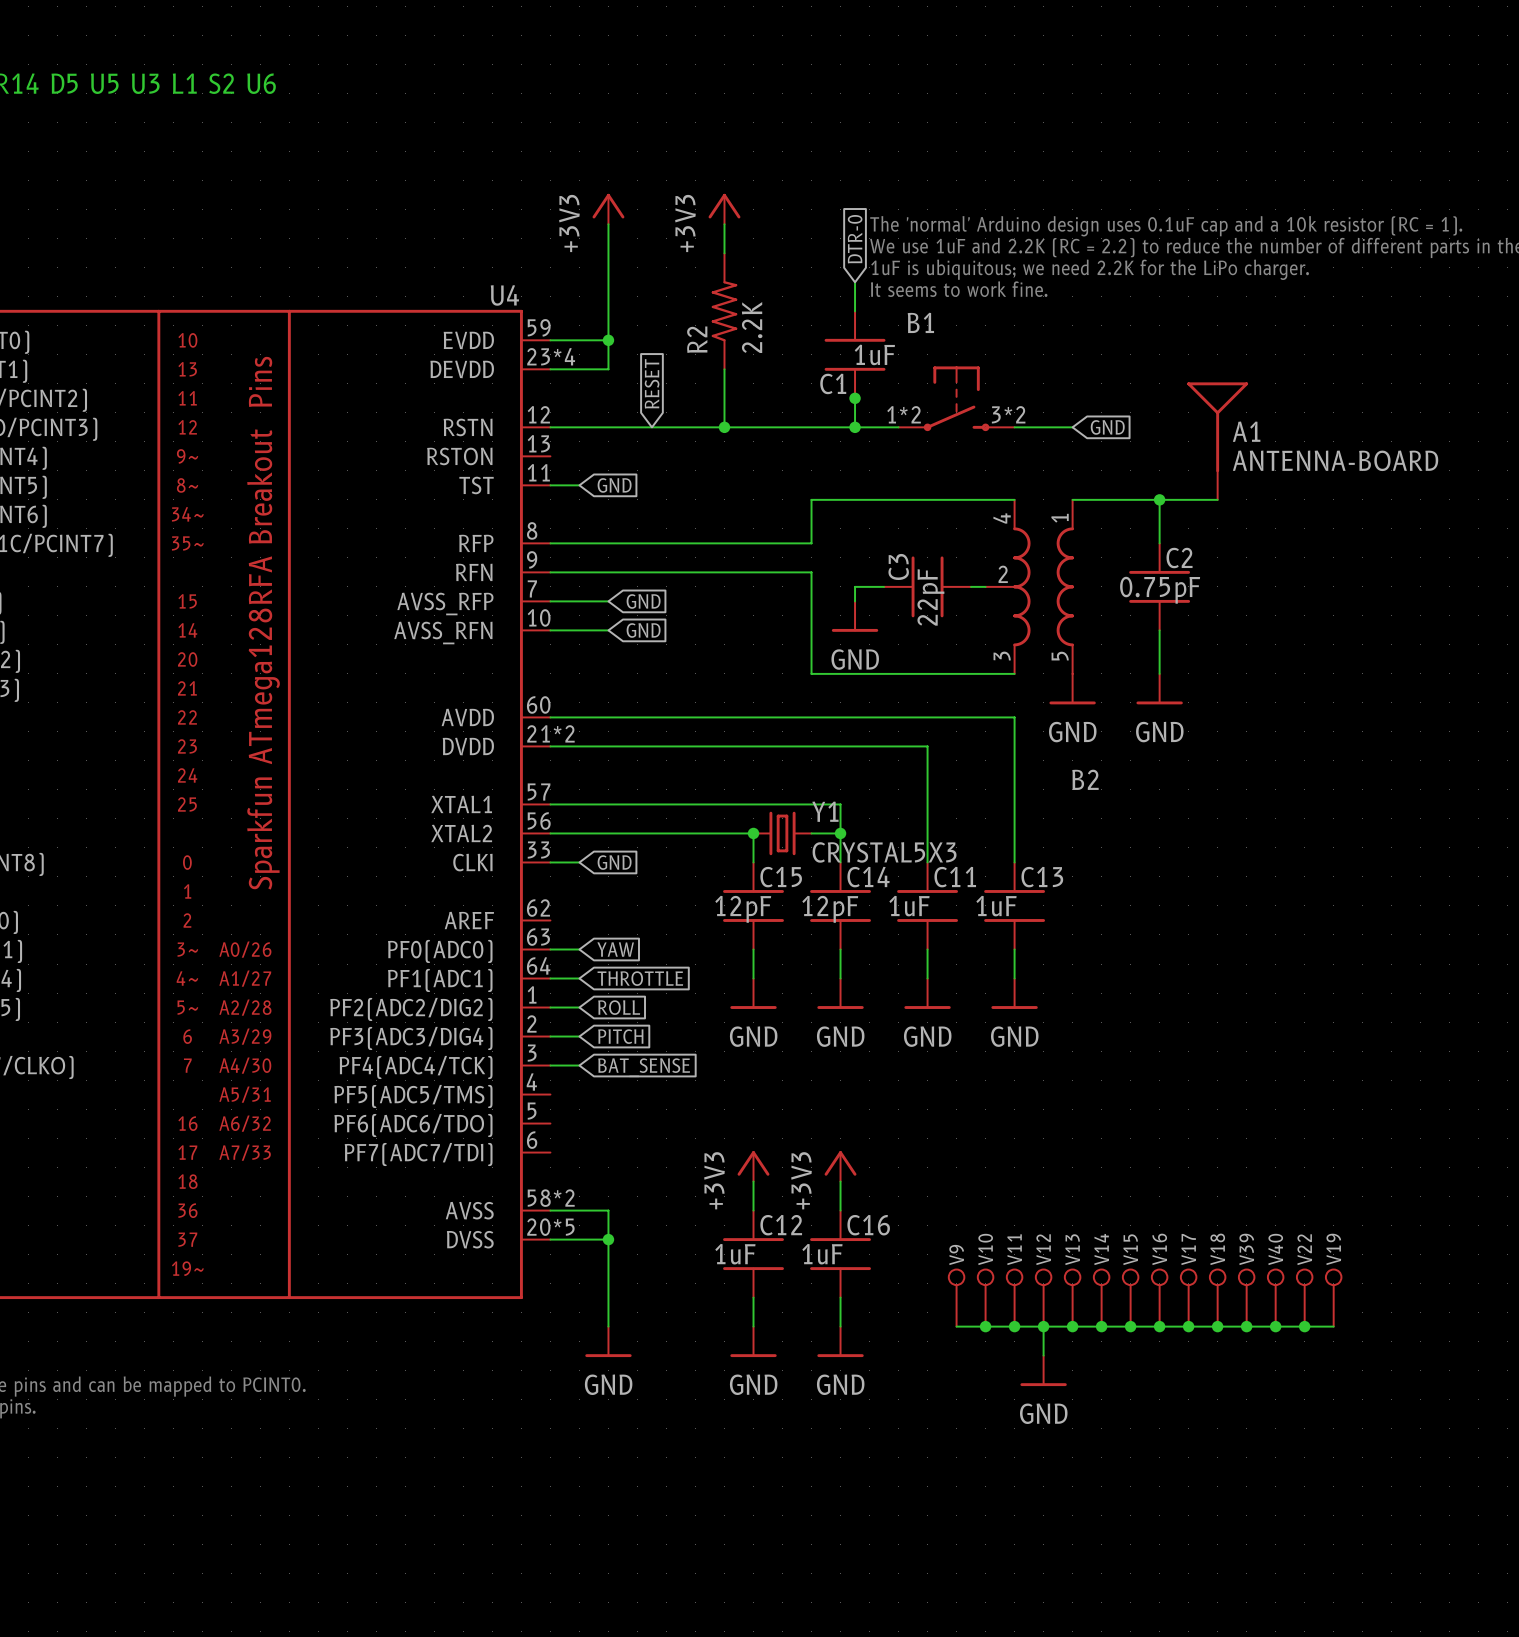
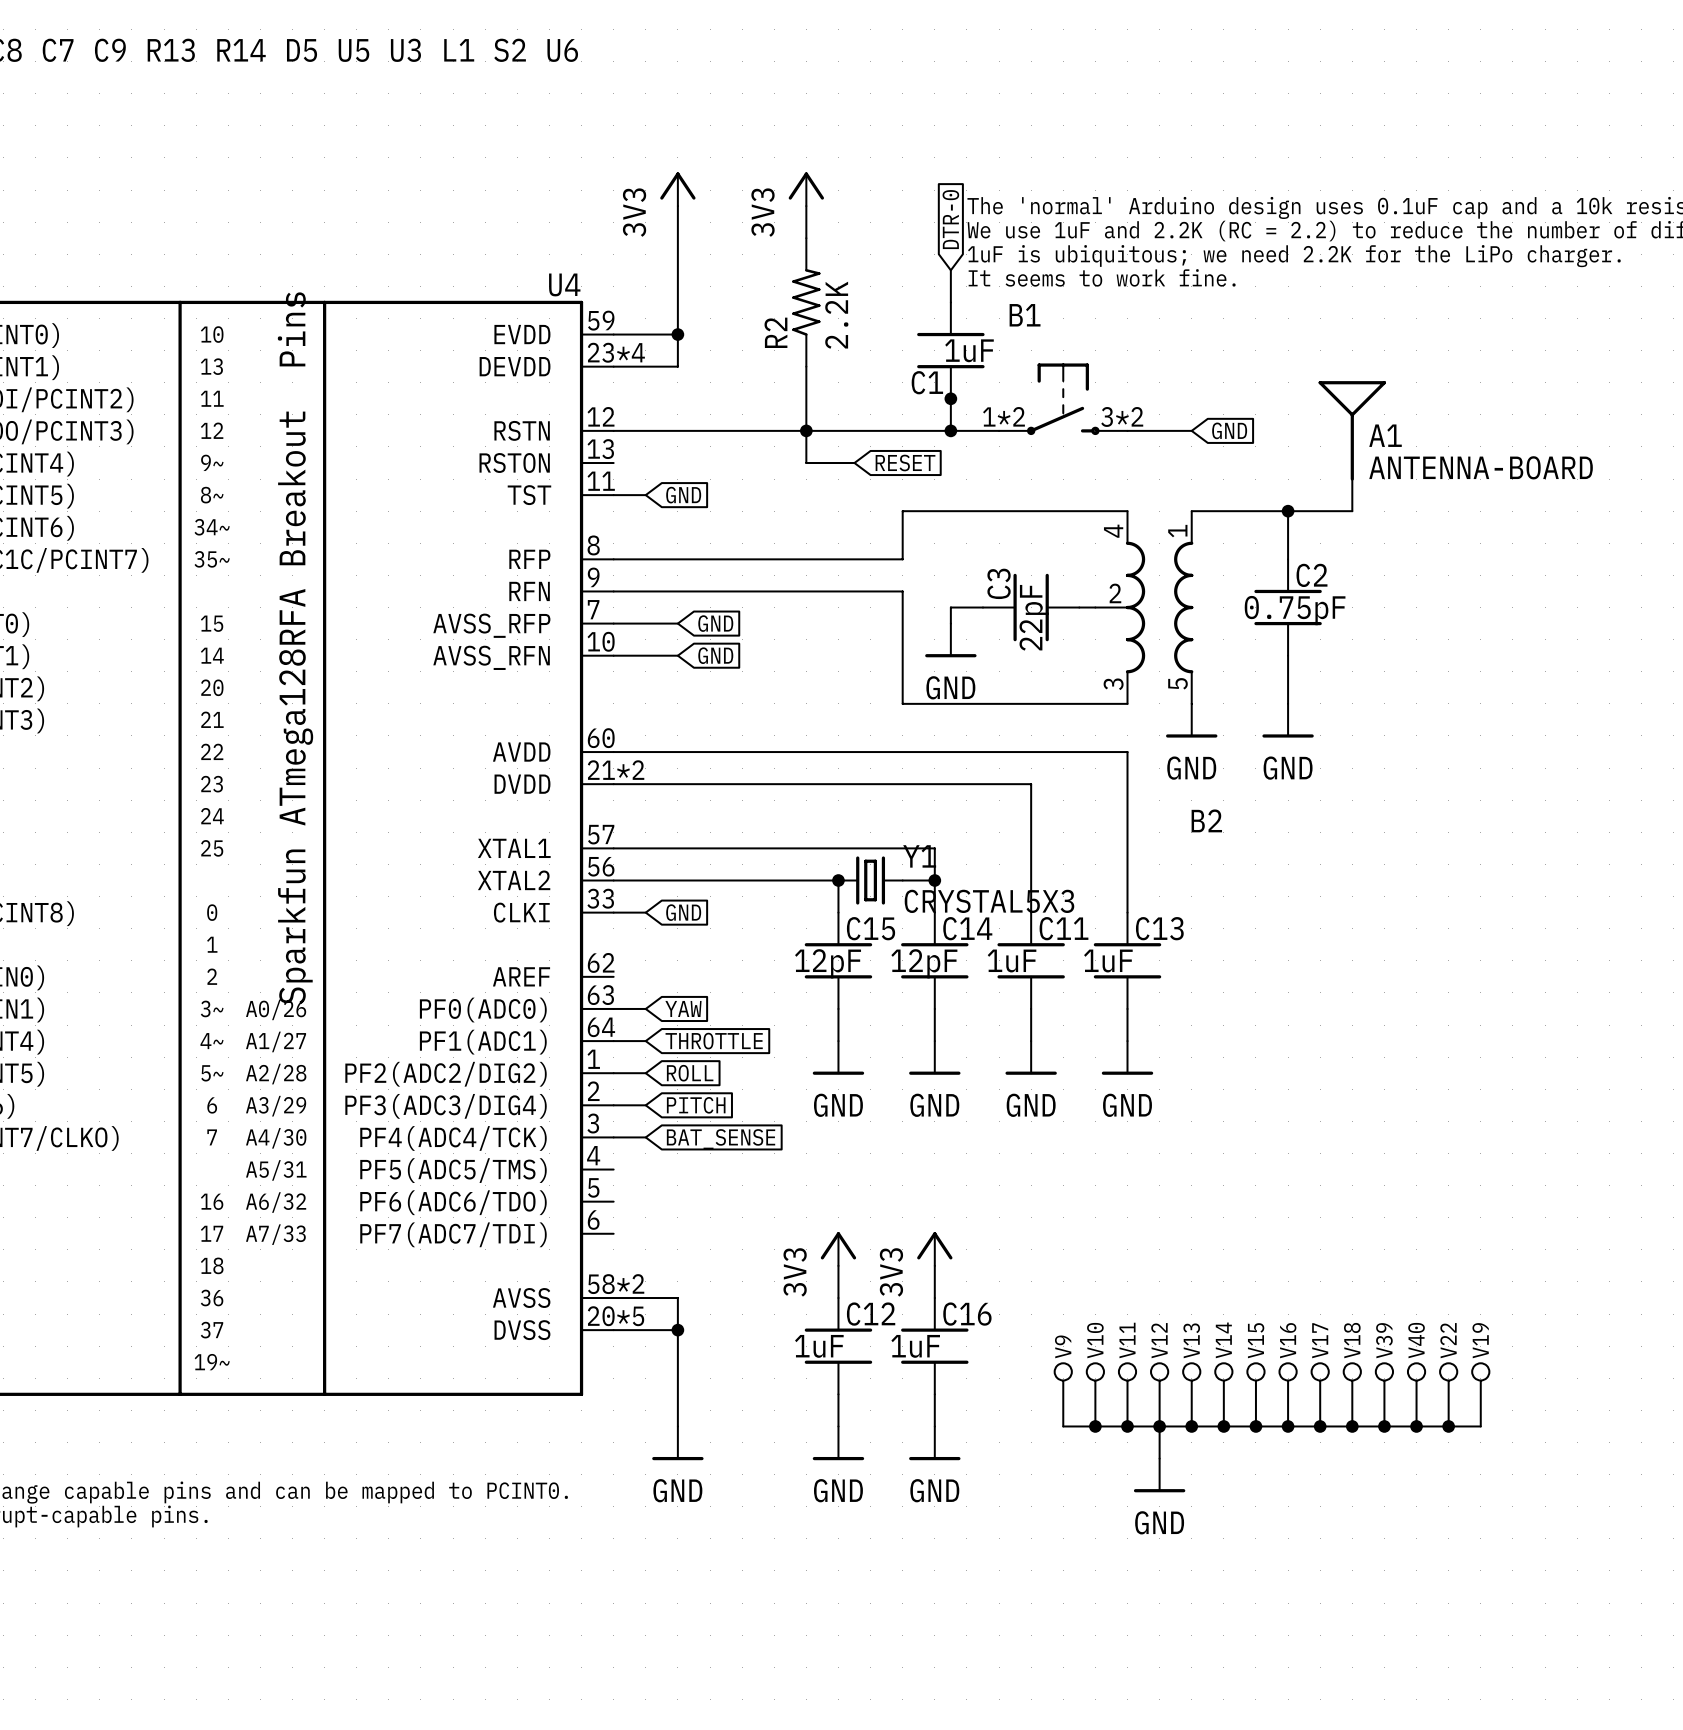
power symbol: +3V3 (608, 209) -> 3V3 (677, 189)
power symbol: +3V3 (724, 209) -> 3V3 (806, 189)
global label rotation: 0° (652, 383) -> 90° clockwise (905, 463)
global label position: RESET (652, 383) -> RESET (905, 463)
wire: none -> (806, 430) (806, 463) (854, 463)
power symbol: +3V3 (753, 1166) -> 3V3 (838, 1249)
power symbol: +3V3 (840, 1166) -> 3V3 (934, 1249)

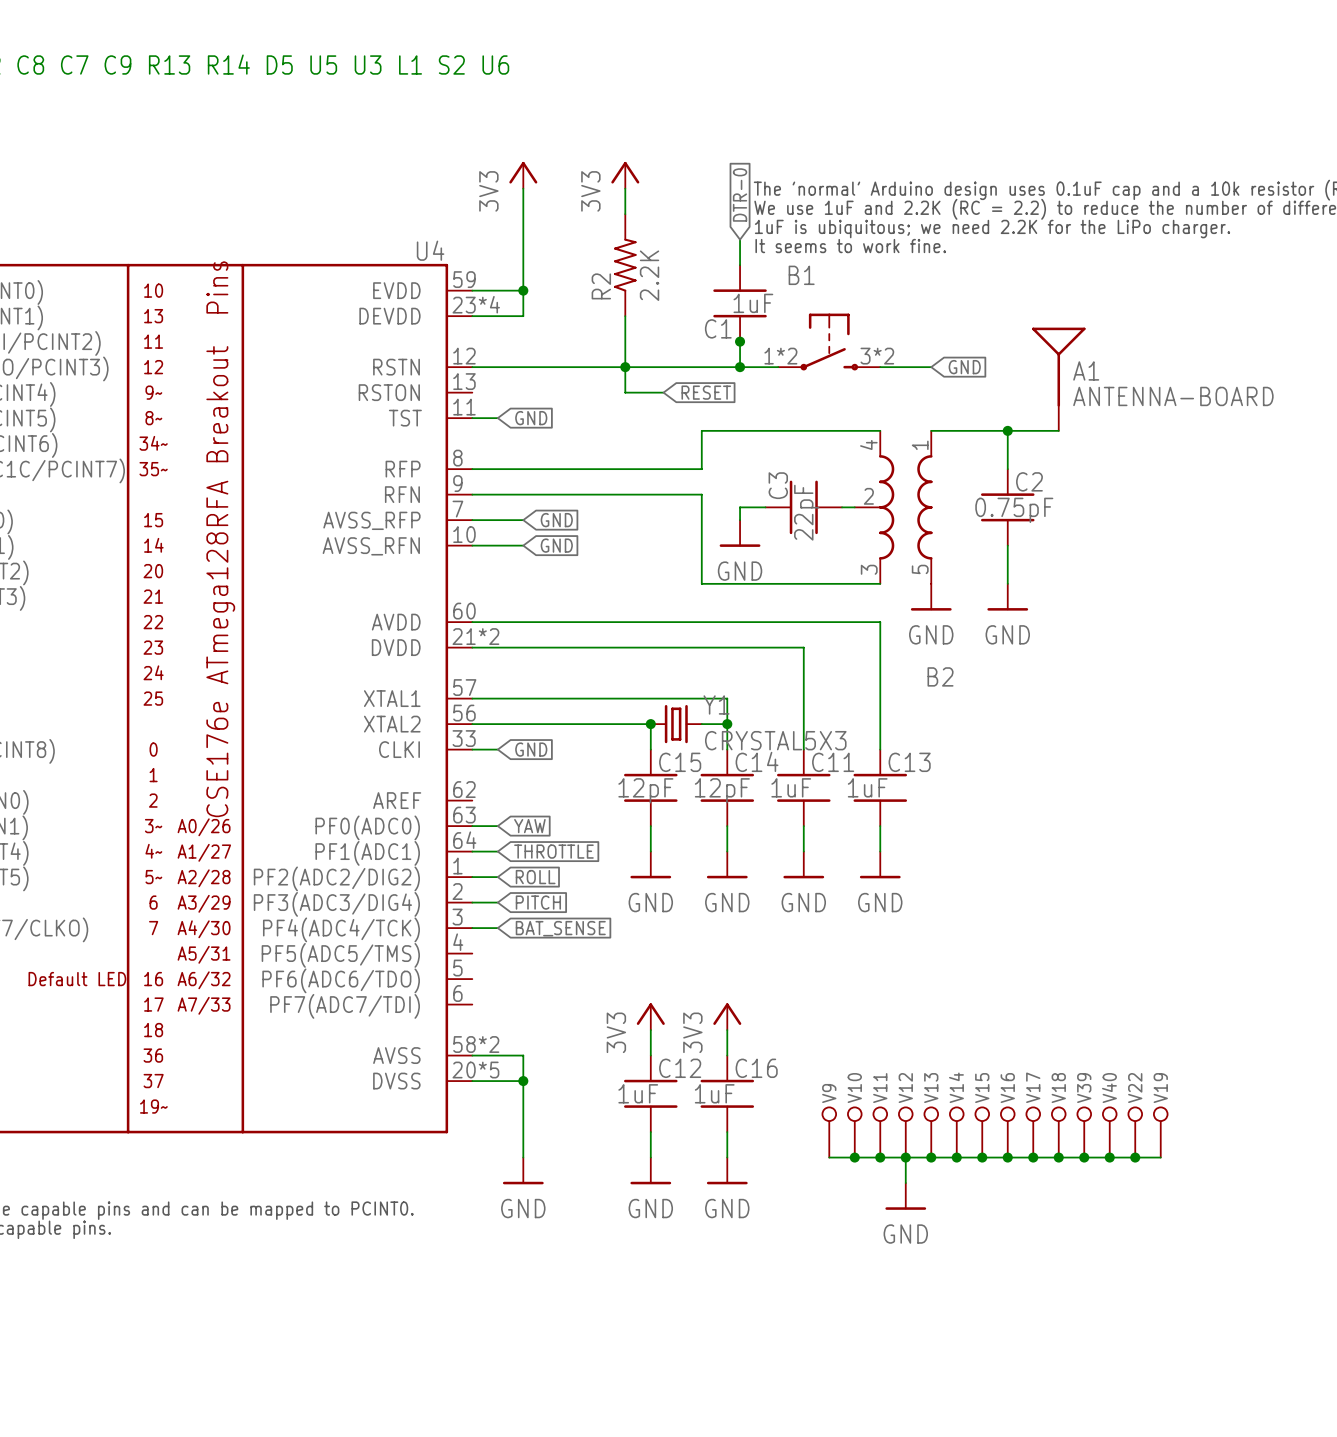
U4 text: Sparkfun ATmega128RFA Breakout Pins (295, 648) -> CSE176e ATmega128RFA Breakout Pins (220, 539)
U4 text: none -> Default LED (77, 979)

